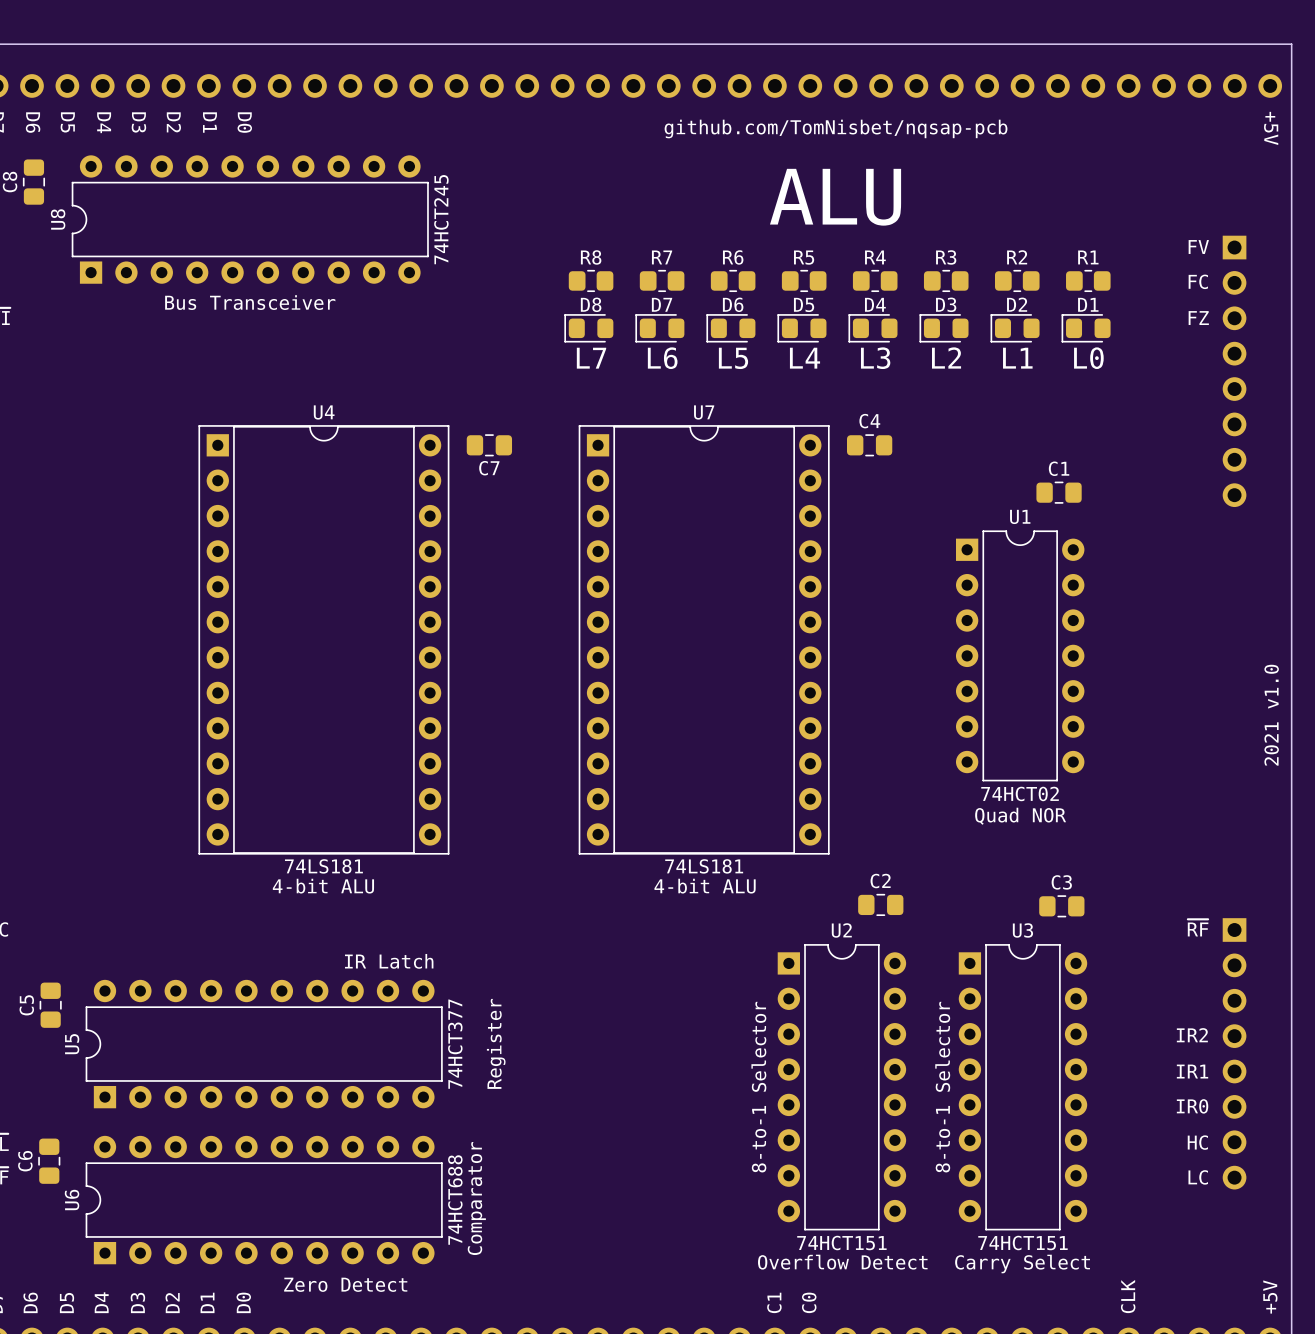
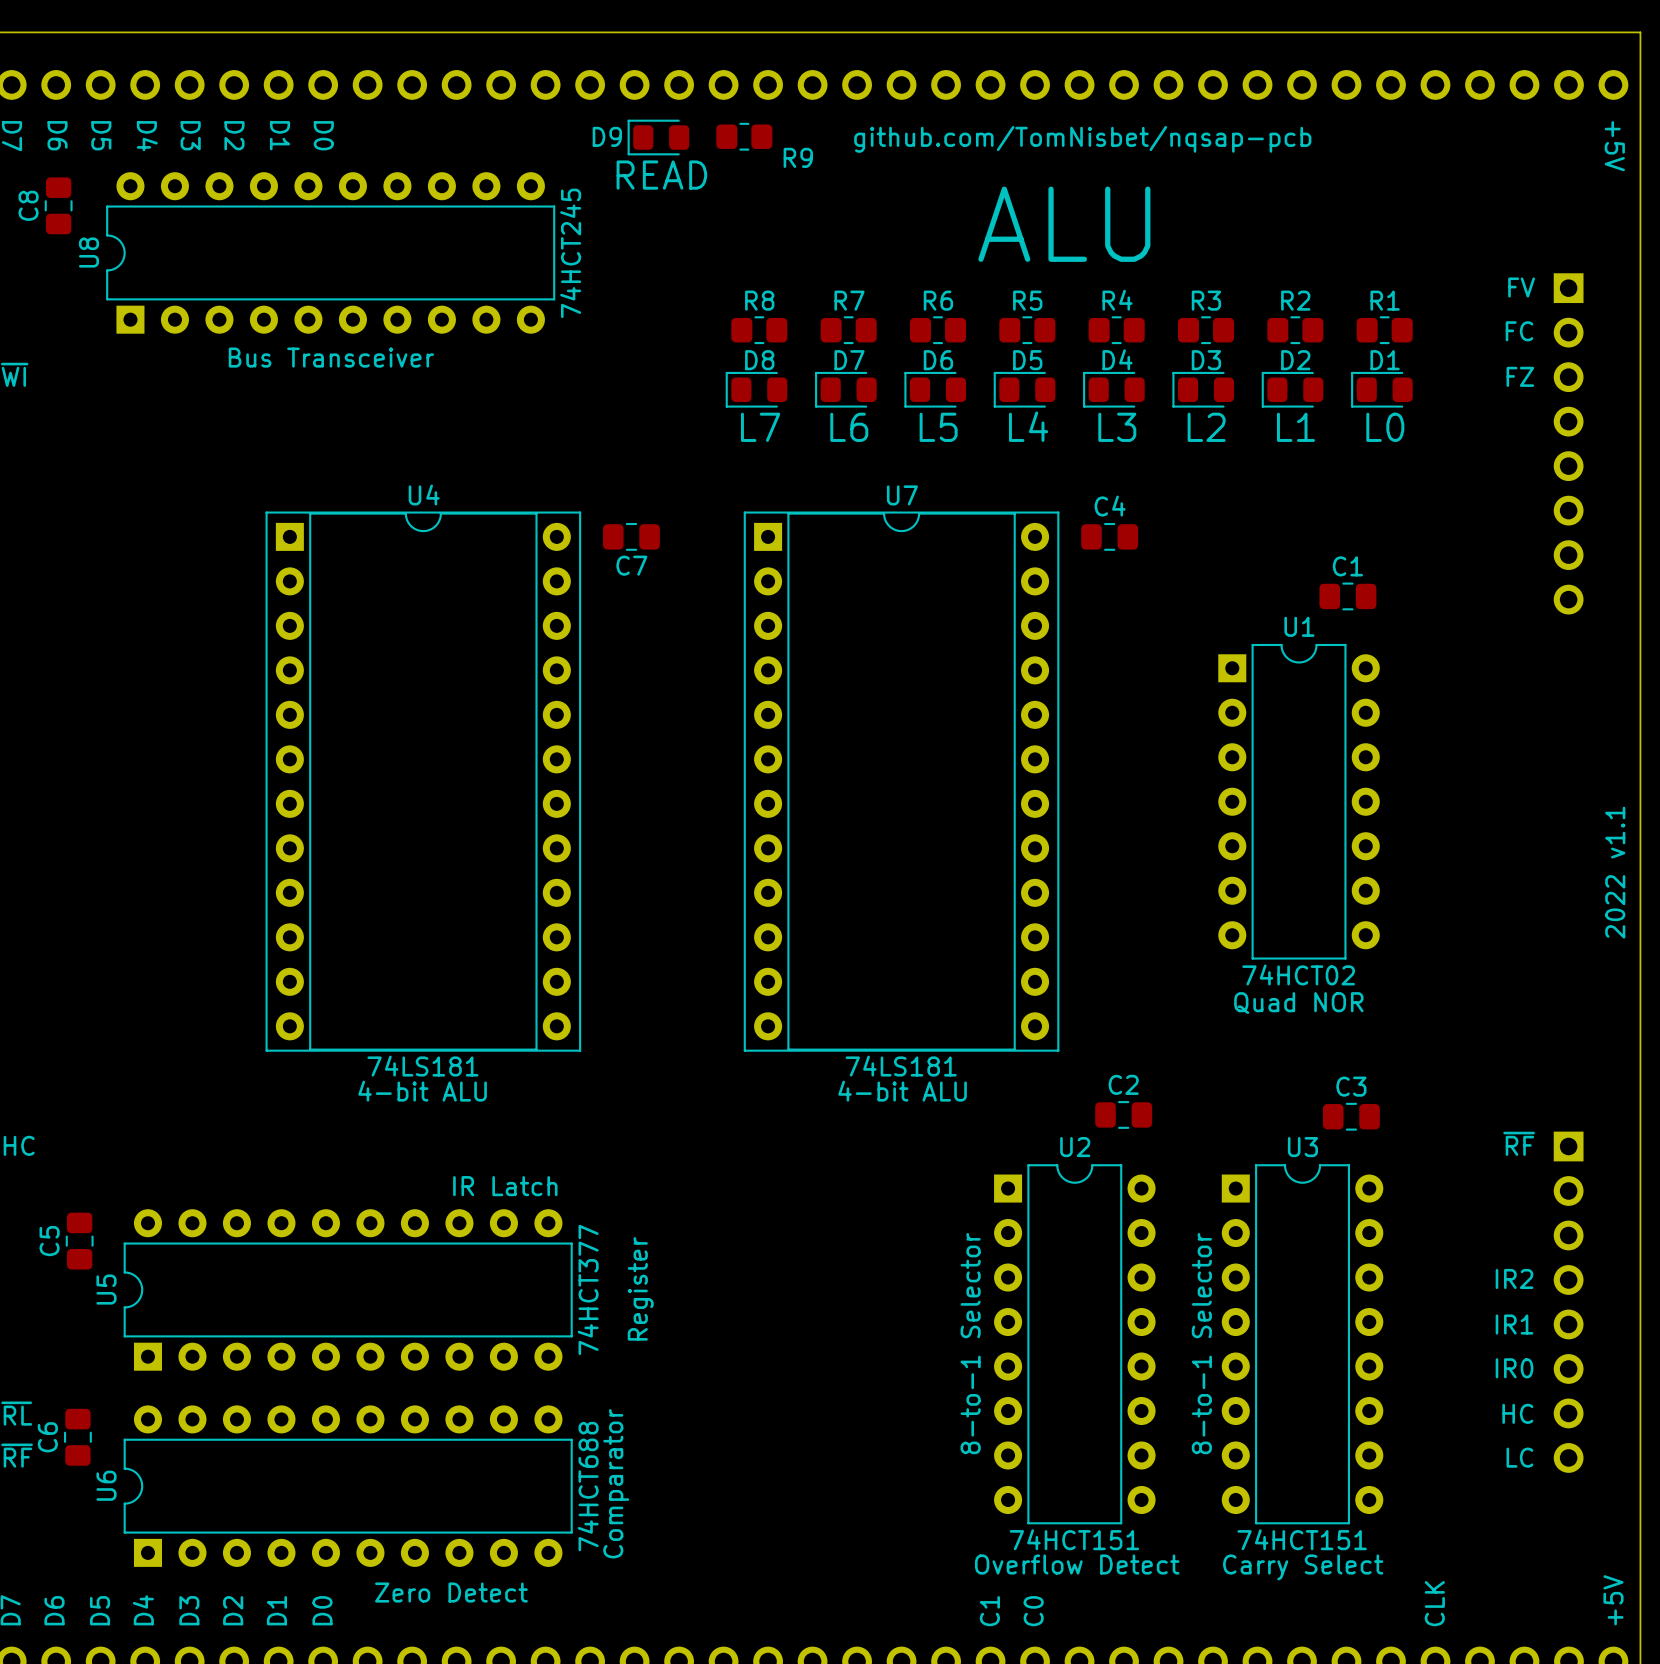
D9: none -> READ (658, 137)
R9: none -> (744, 136)
text: 2021 v1.0 (1271, 715) -> 2022 v1.1 (1615, 872)

